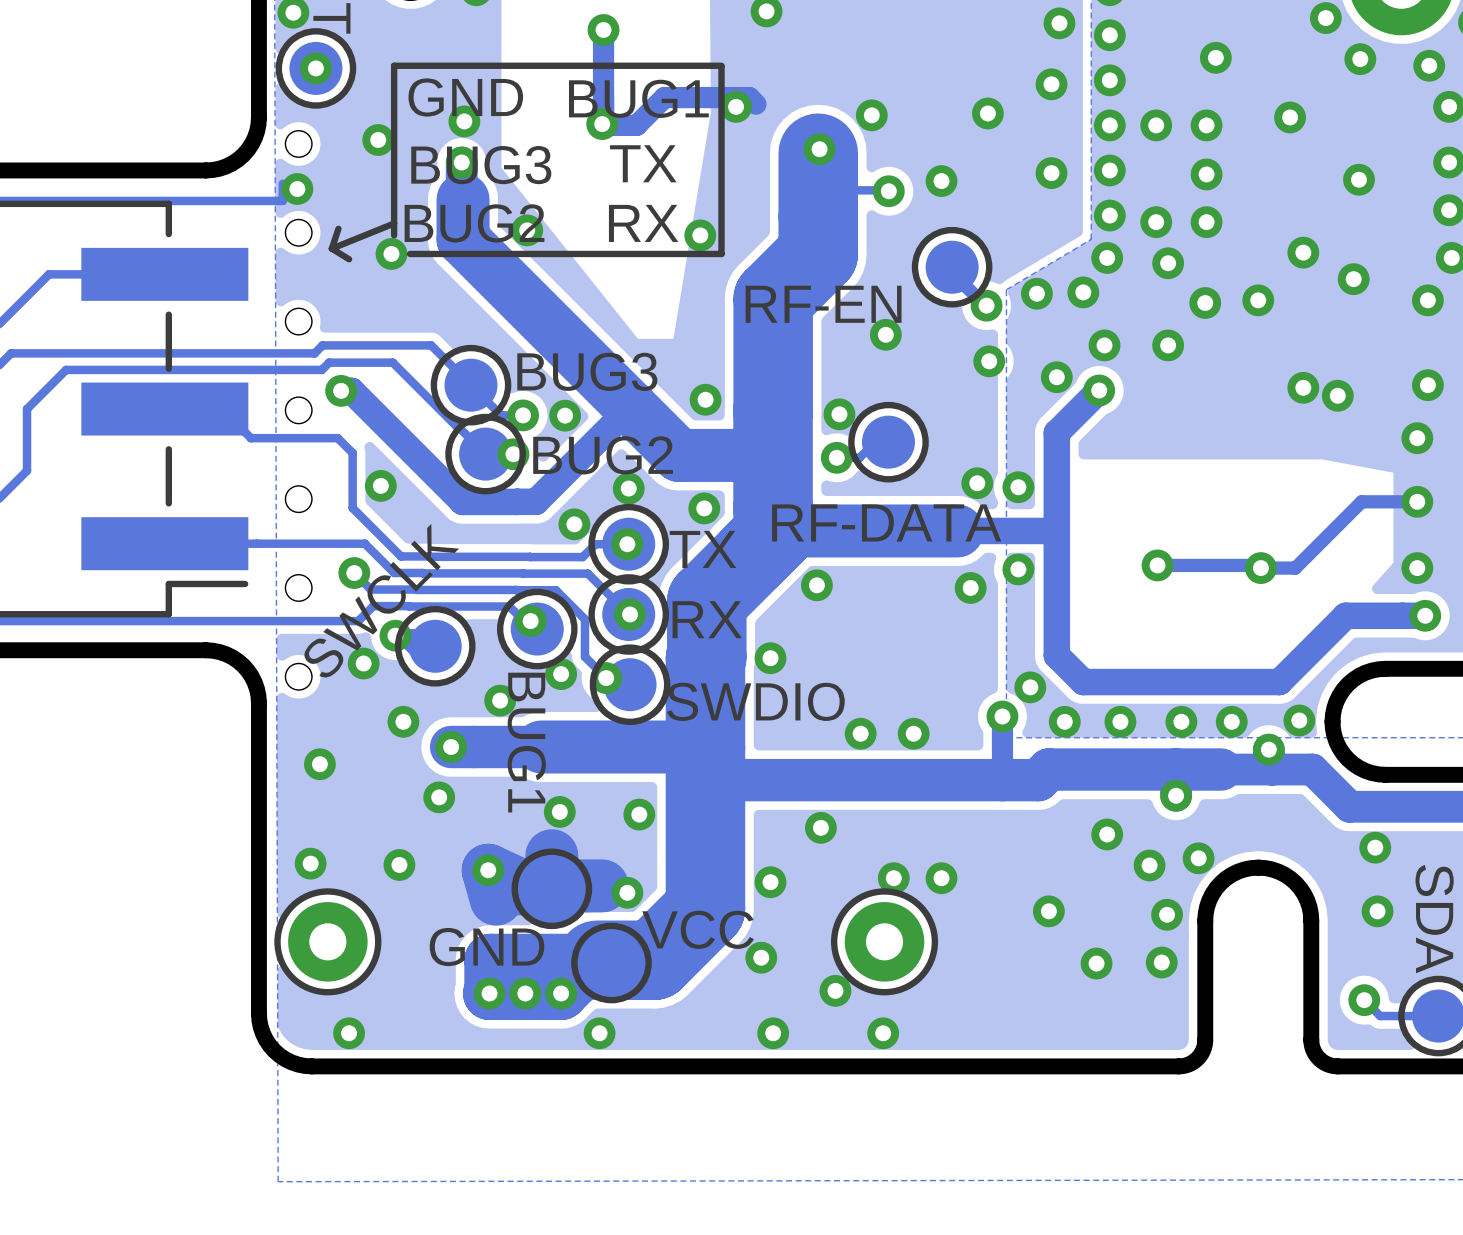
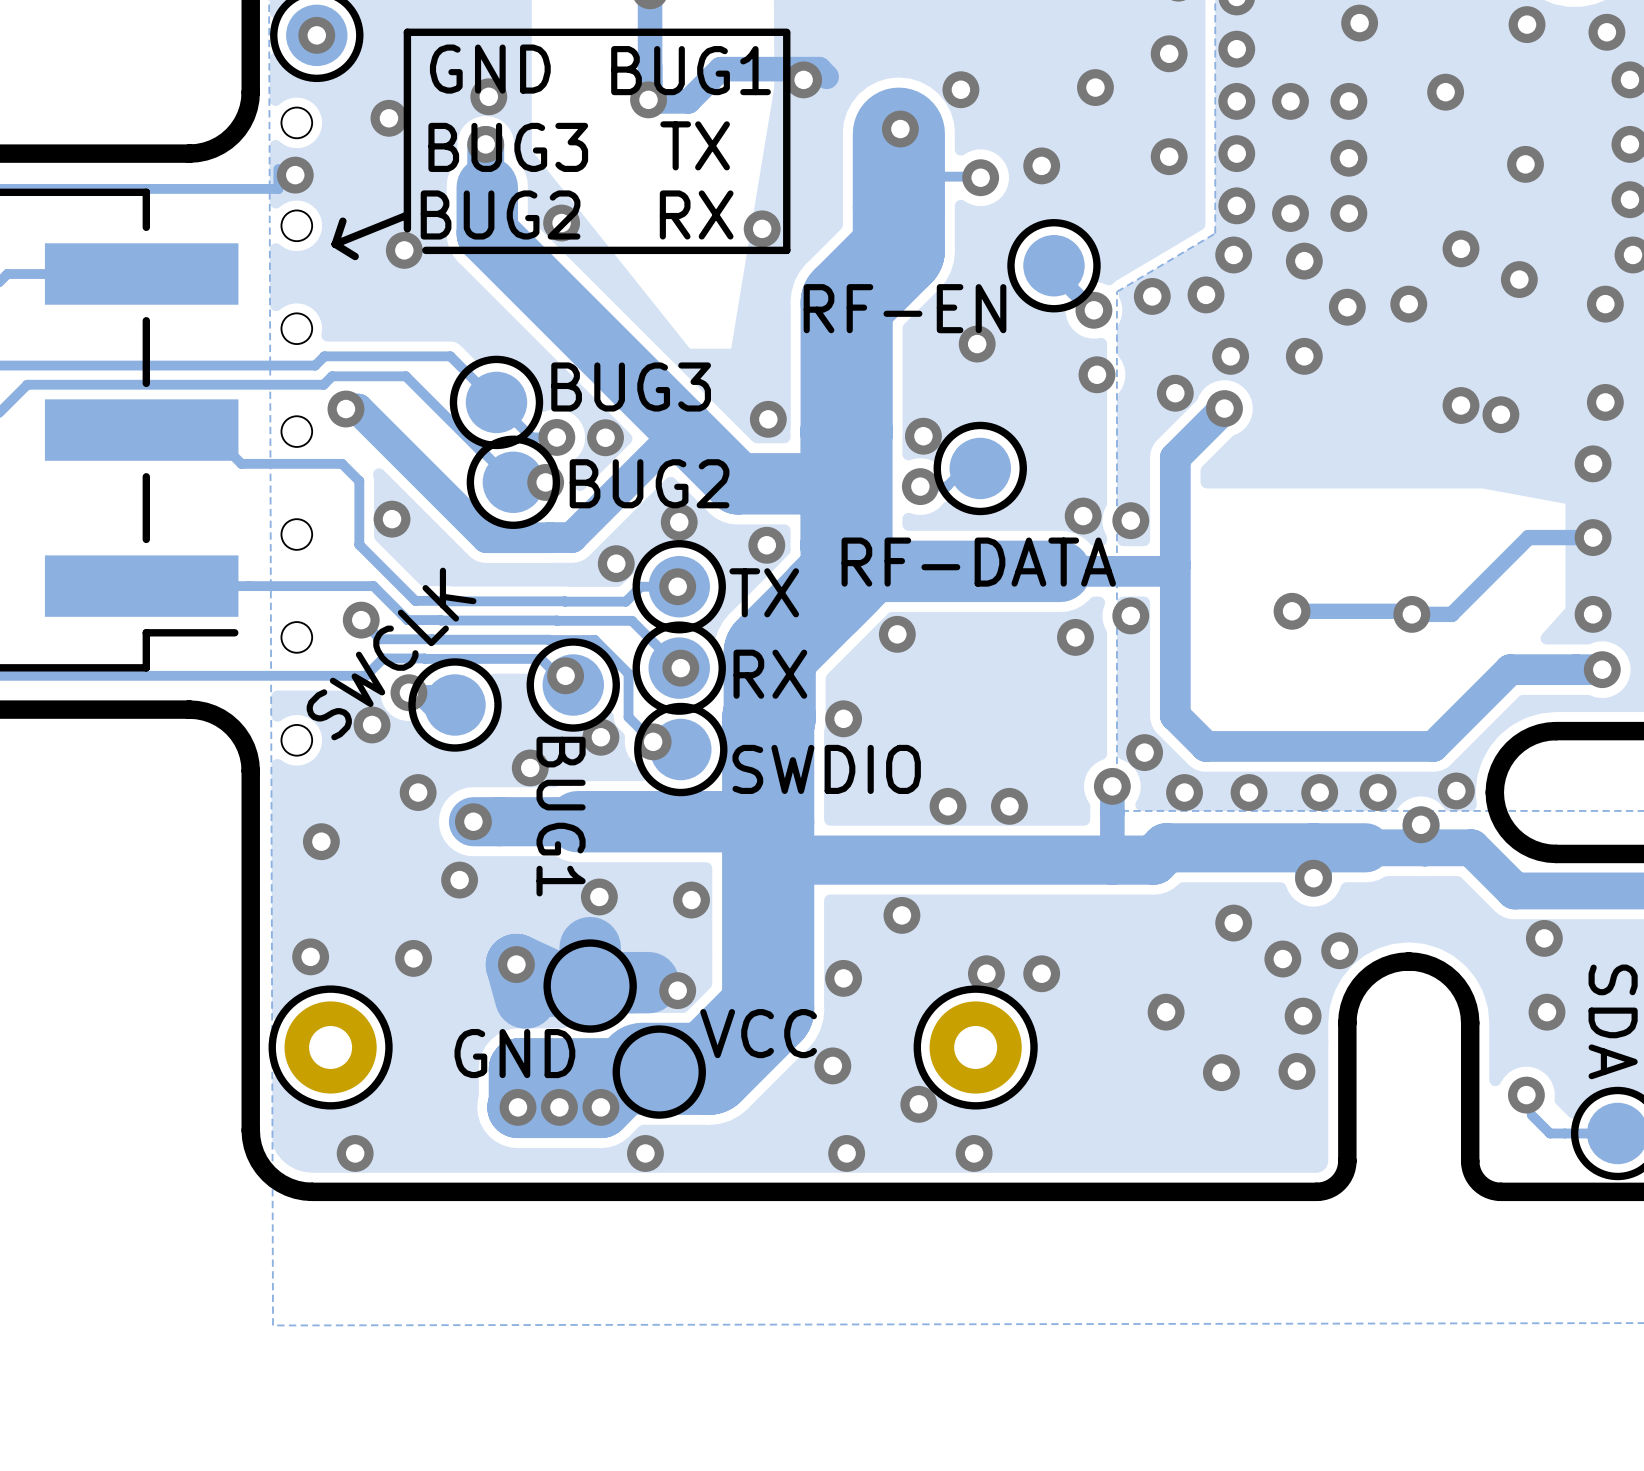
via position: (1364, 1000) -> (1526, 1095)

